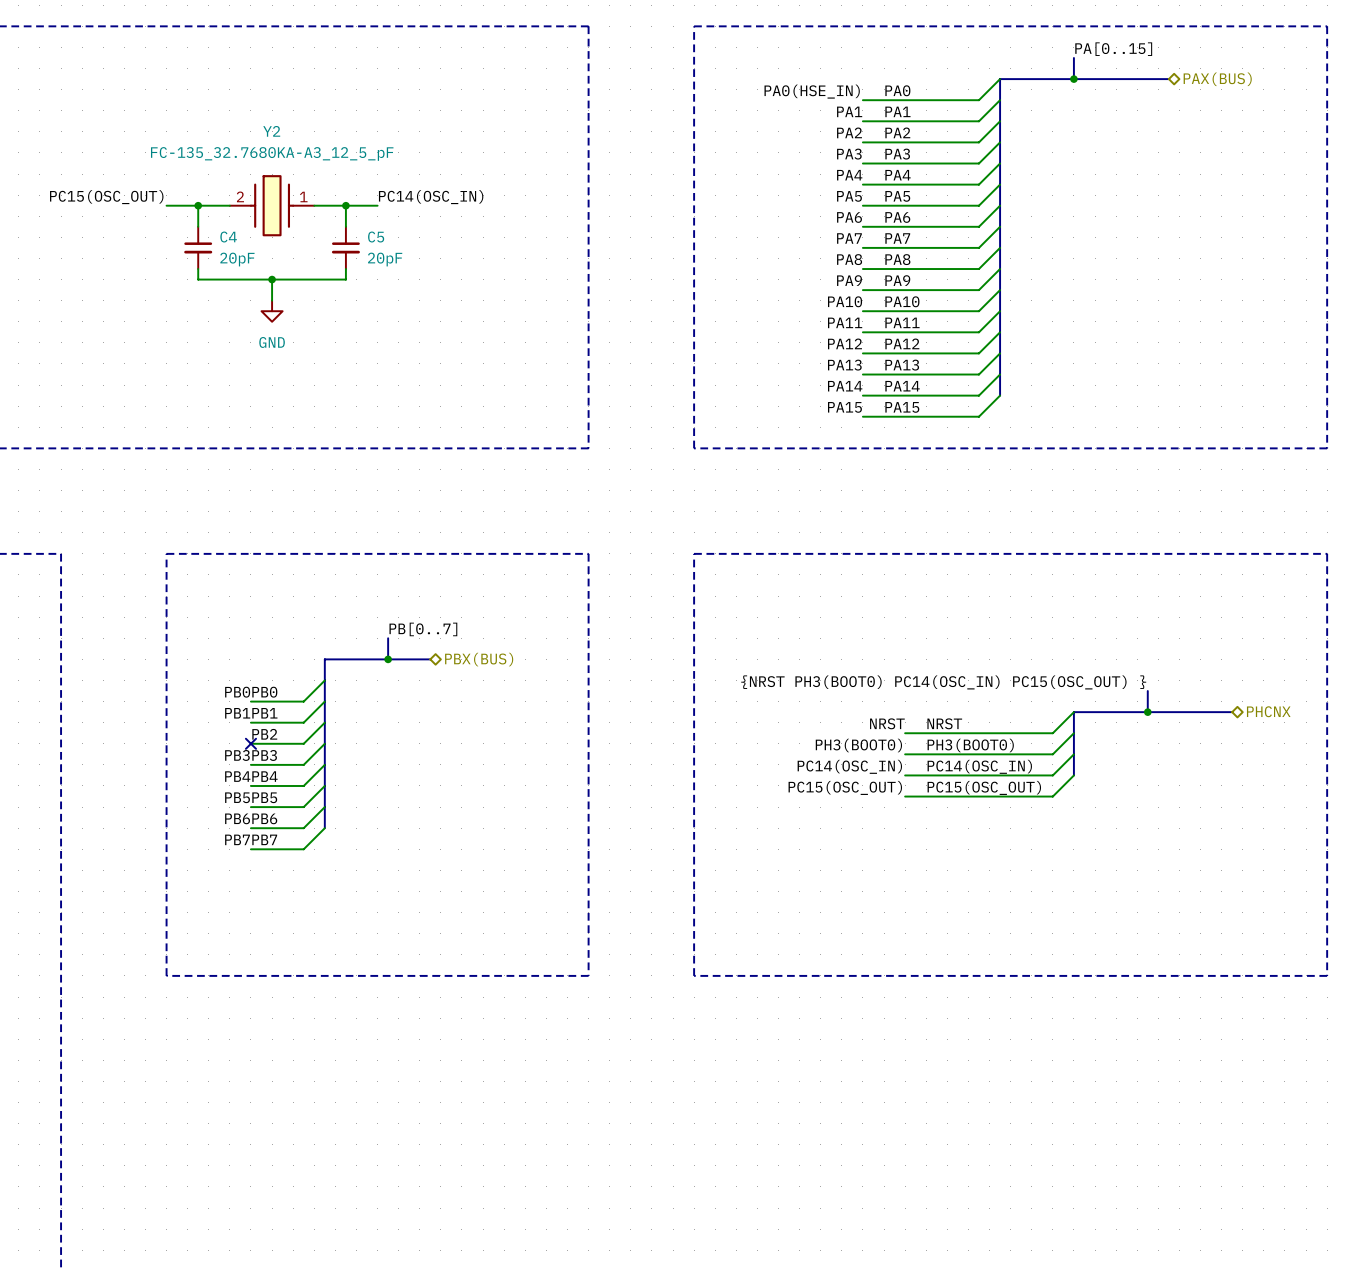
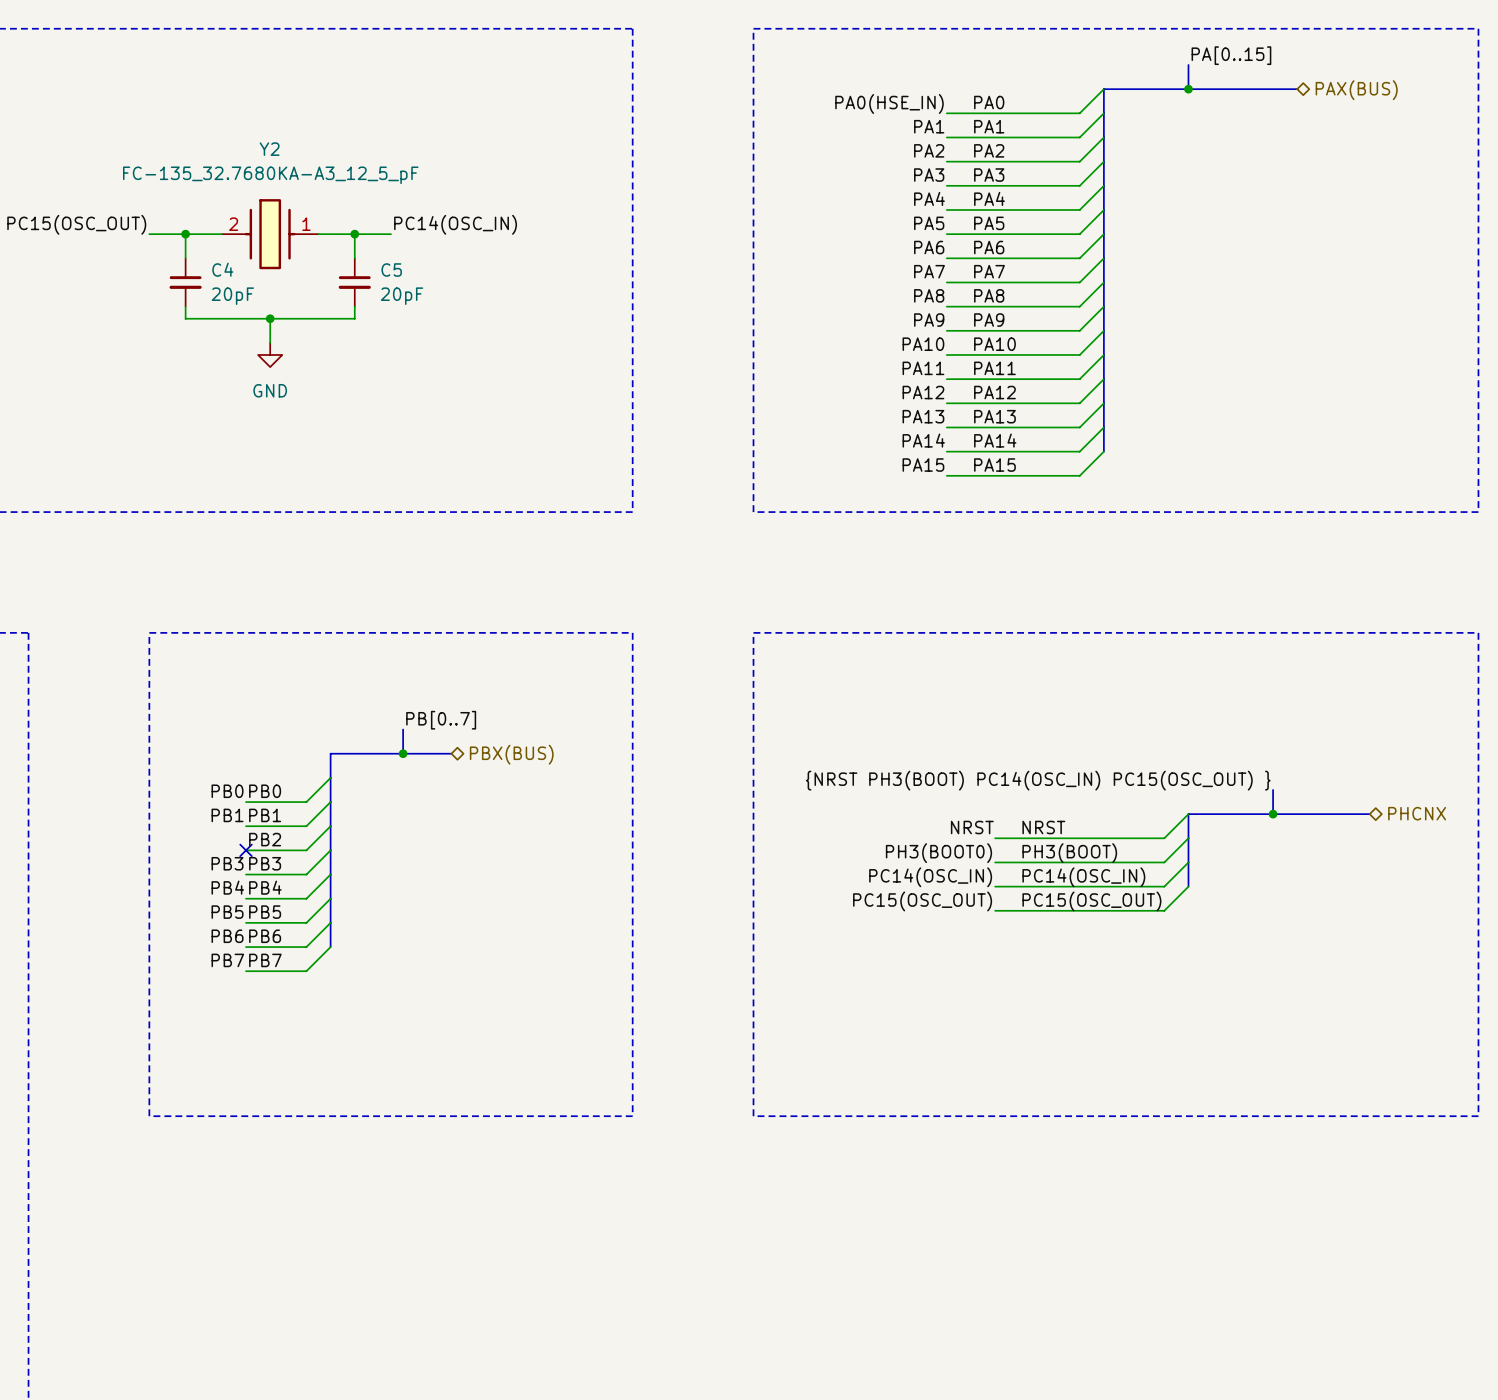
label: {NRST PH3(BOOT0) PC14(OSC_IN) PC15(OSC_OUT) } (943, 682) -> {NRST PH3(BOOT) PC14(OSC_IN) PC15(OSC_OUT) } (1038, 780)
label: PH3(BOOT0) (970, 745) -> PH3(BOOT) (1069, 853)

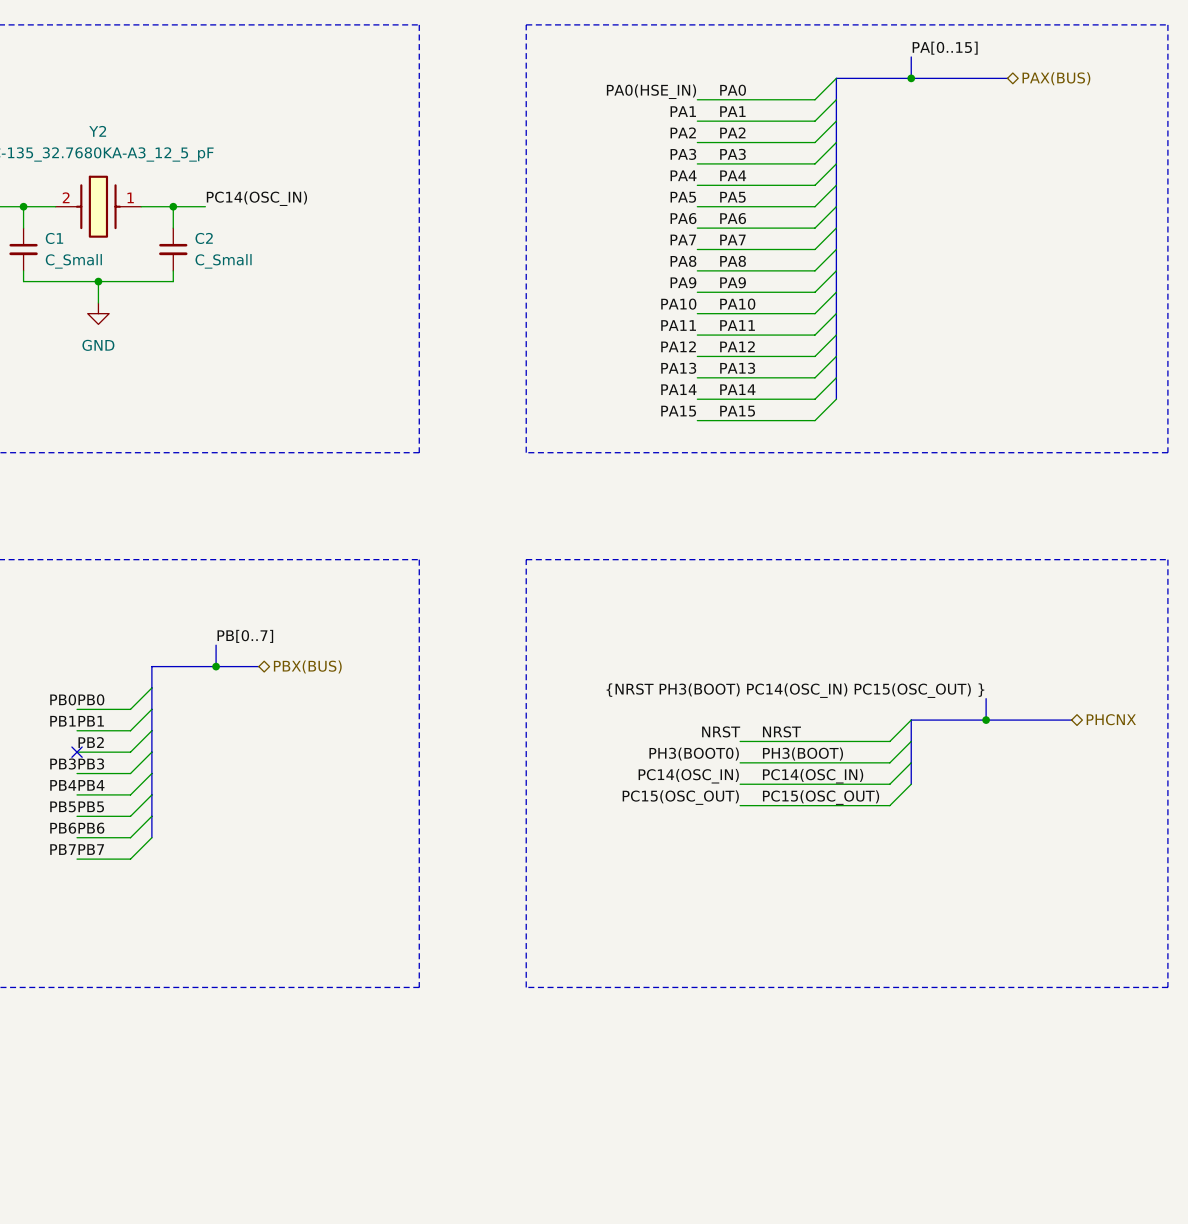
C4 name: C4 (222, 269) -> C1 (54, 238)
C5 name: C5 (391, 270) -> C2 (204, 238)
C4 value: 20pF (232, 296) -> C_Small (73, 261)
C5 value: 20pF (402, 296) -> C_Small (223, 261)

